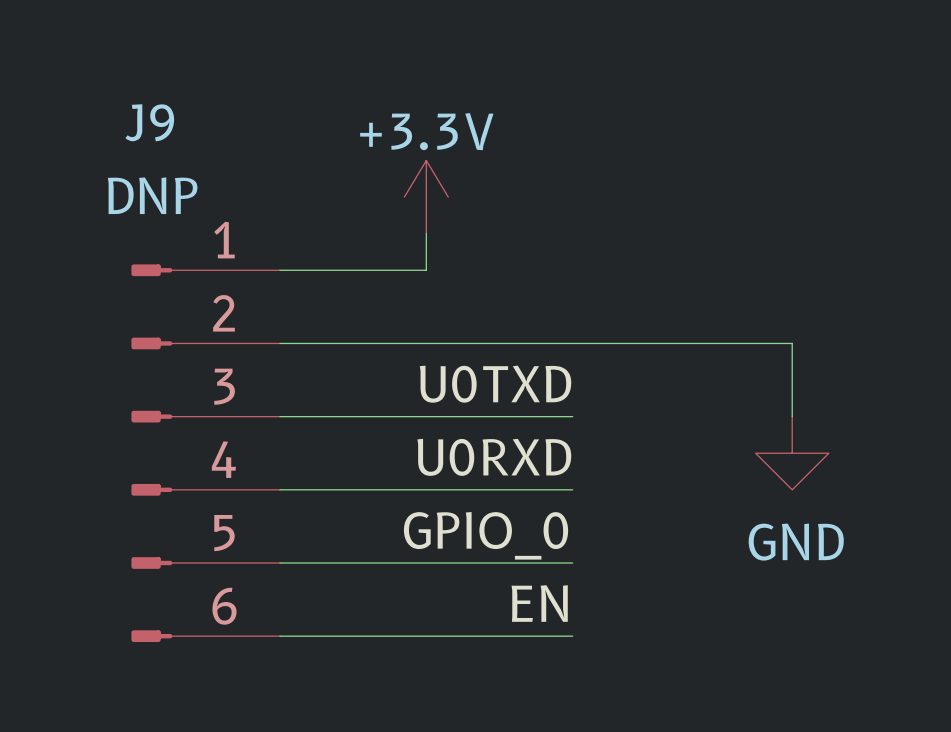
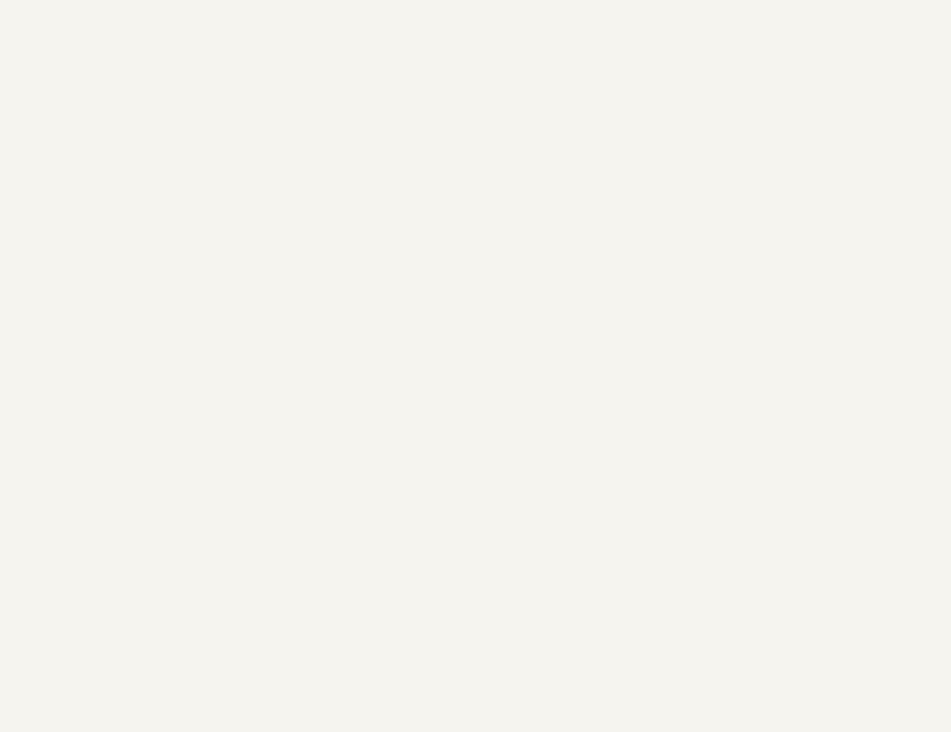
power symbol: +3.3V (426, 197) -> none
wire: (426, 233) (426, 270) (279, 270) -> none
wire: (279, 343) (792, 343) (792, 416) -> none
label: U0TXD (495, 384) -> none
wire: (279, 416) (572, 416) -> none
J9: DNP (205, 453) -> none
power symbol: GND (792, 453) -> none
label: U0RXD (494, 457) -> none
wire: (279, 489) (572, 489) -> none
label: GPIO_0 (486, 535) -> none
wire: (279, 562) (572, 562) -> none
label: EN (539, 603) -> none
wire: (279, 636) (572, 636) -> none

